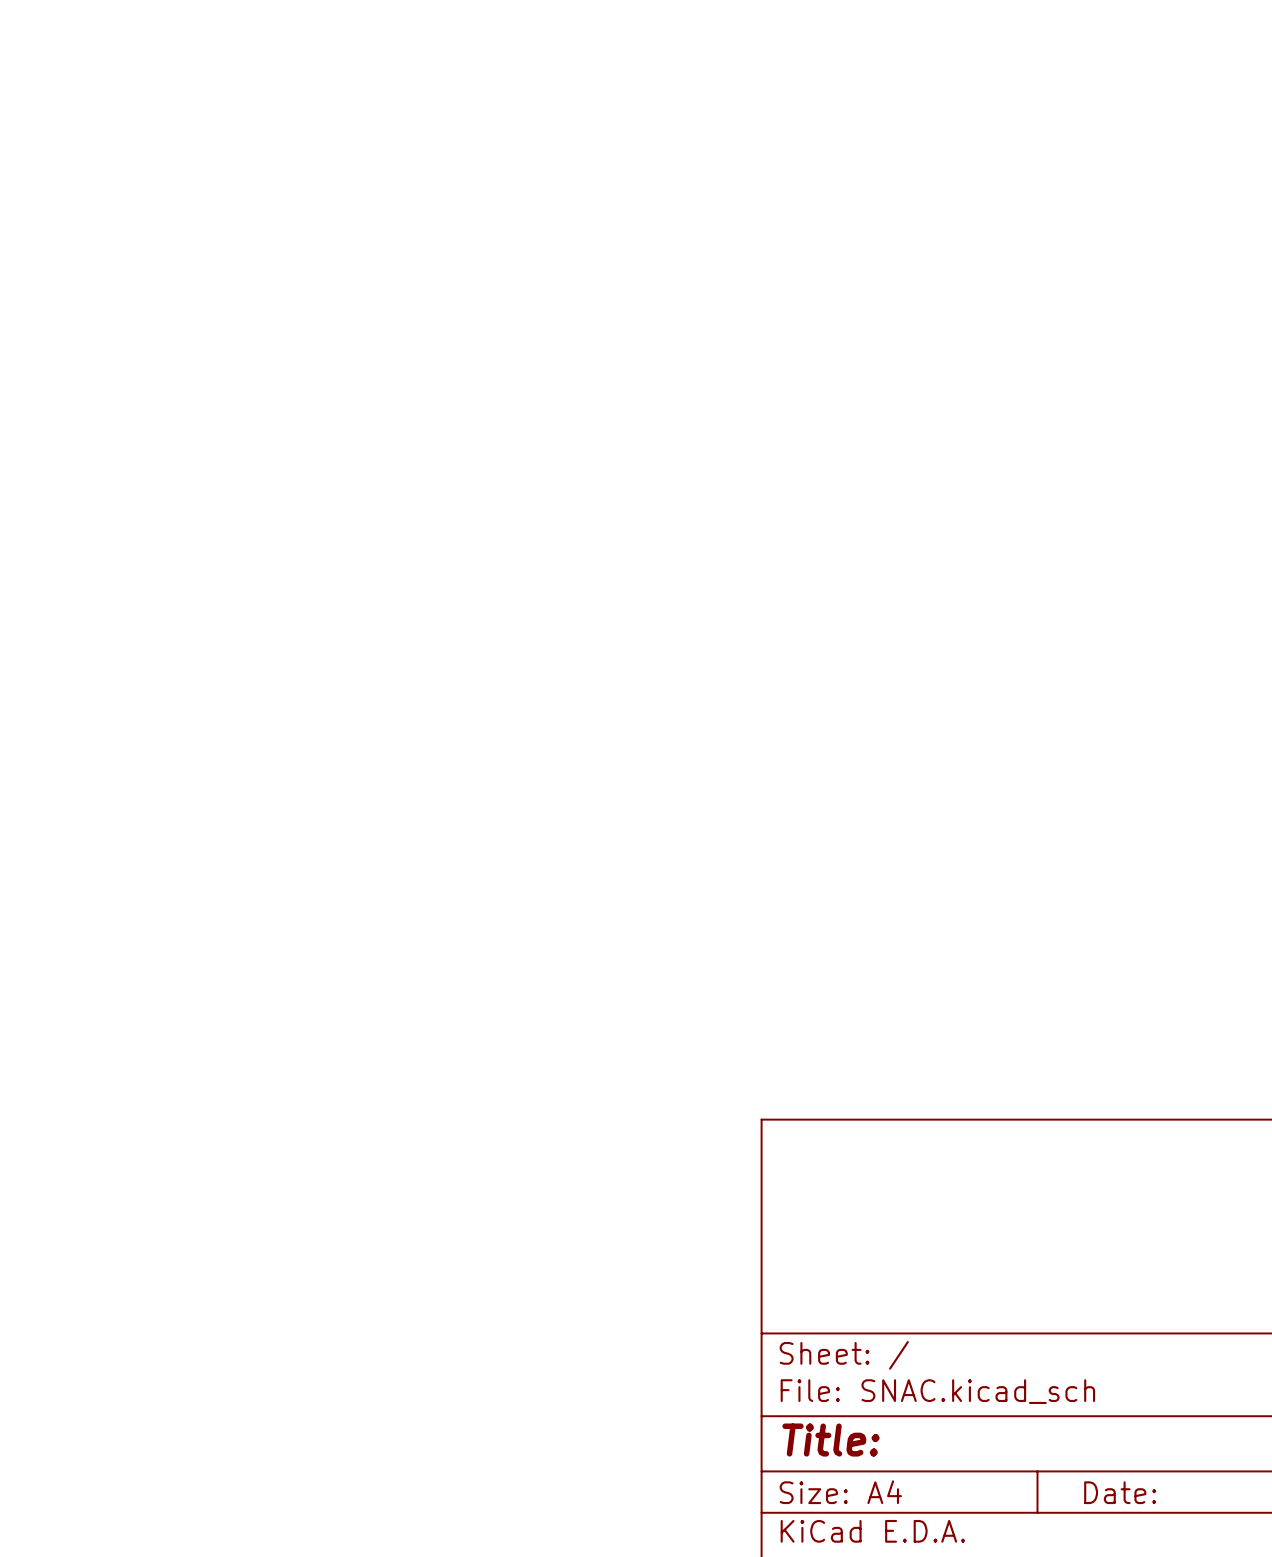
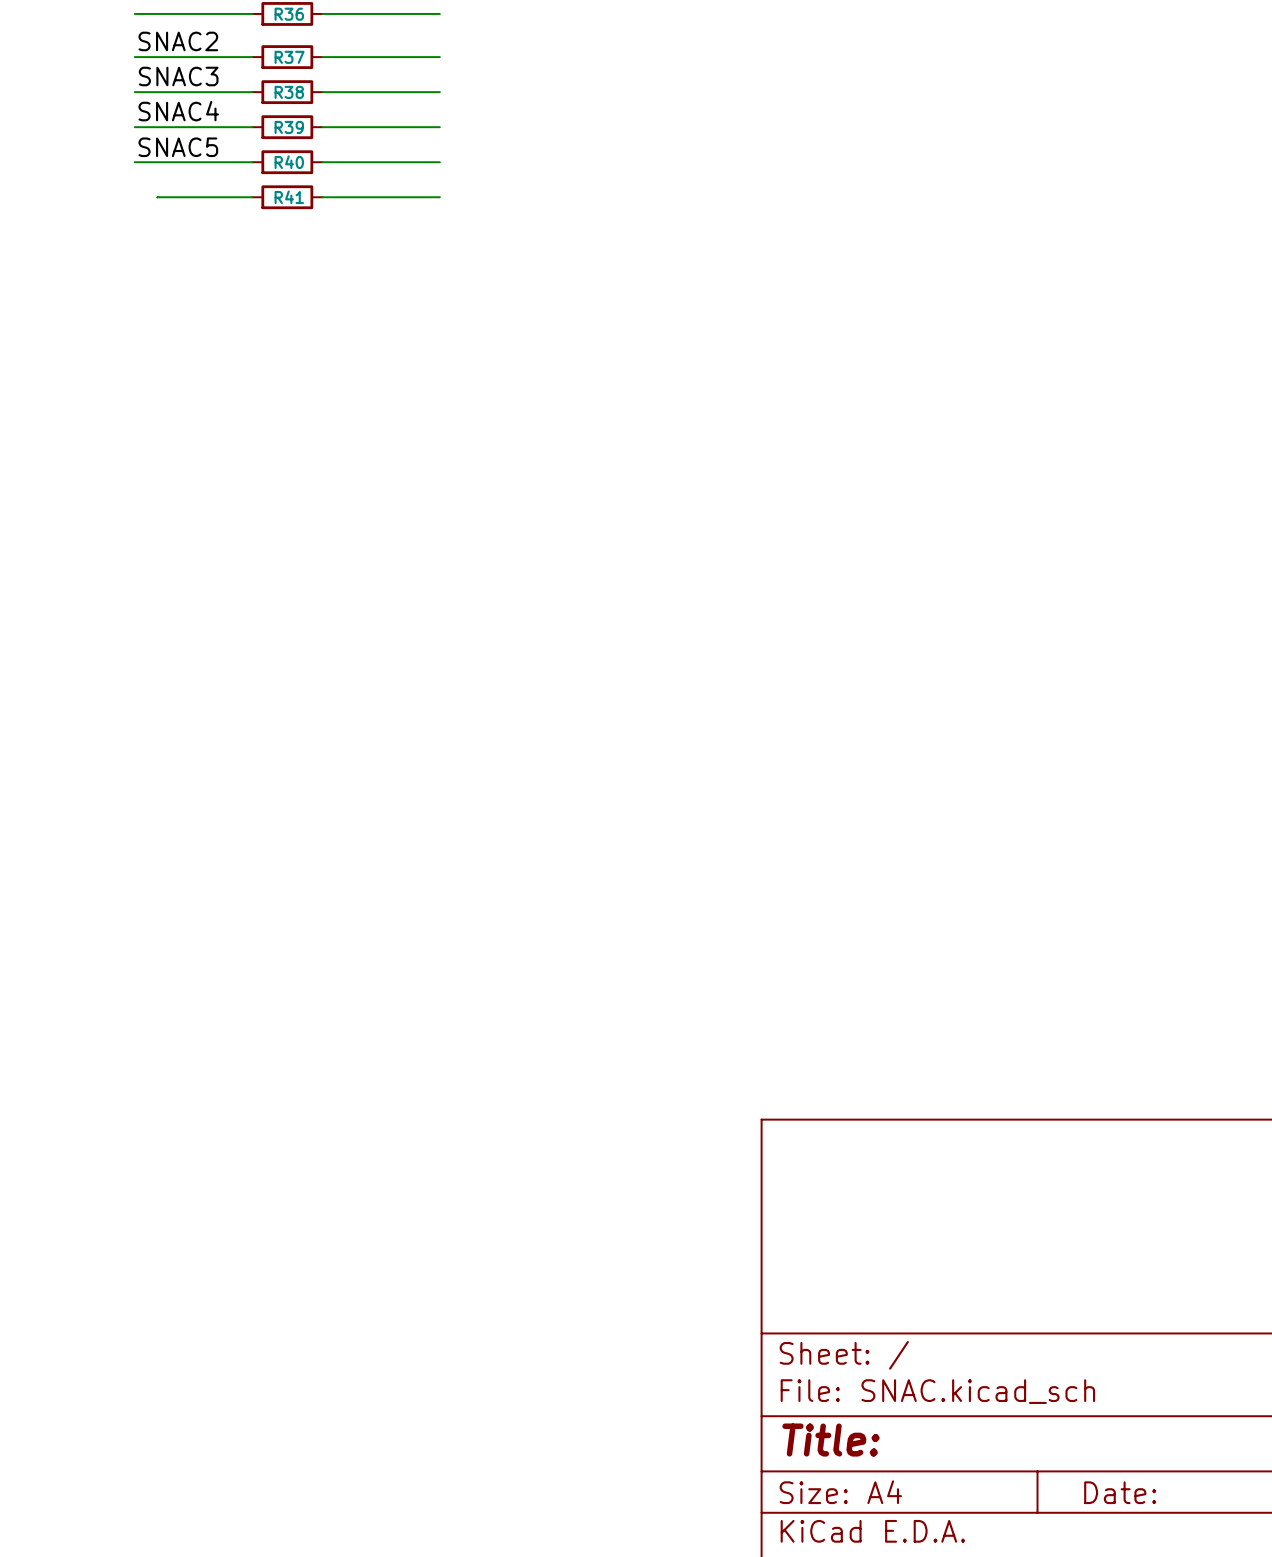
wire: none -> (134, 13) (252, 13)
R36: none -> (287, 13)
wire: none -> (322, 13) (439, 13)
label: none -> SNAC2 (178, 41)
wire: none -> (134, 57) (252, 57)
R37: none -> (287, 57)
wire: none -> (322, 57) (439, 57)
label: none -> SNAC3 (178, 76)
wire: none -> (134, 92) (252, 92)
R38: none -> (287, 92)
wire: none -> (322, 92) (439, 92)
label: none -> SNAC4 (178, 111)
wire: none -> (134, 127) (252, 127)
R39: none -> (287, 127)
wire: none -> (322, 127) (439, 127)
label: none -> SNAC5 (178, 147)
wire: none -> (134, 162) (252, 162)
R40: none -> (287, 162)
wire: none -> (322, 162) (439, 162)
wire: none -> (157, 197) (252, 197)
R41: none -> (287, 197)
wire: none -> (322, 197) (439, 197)

